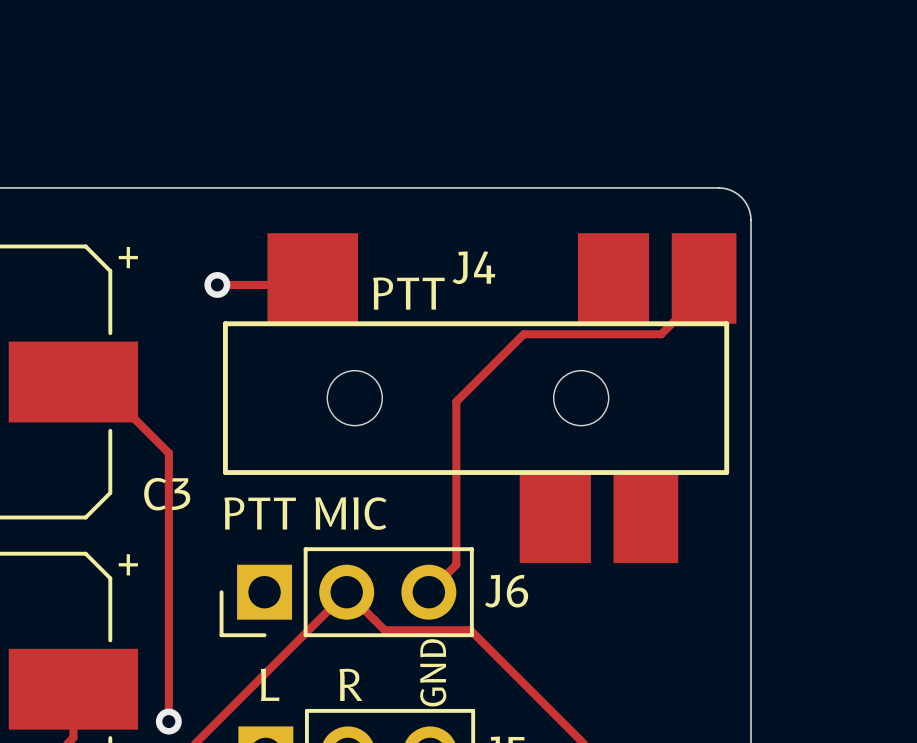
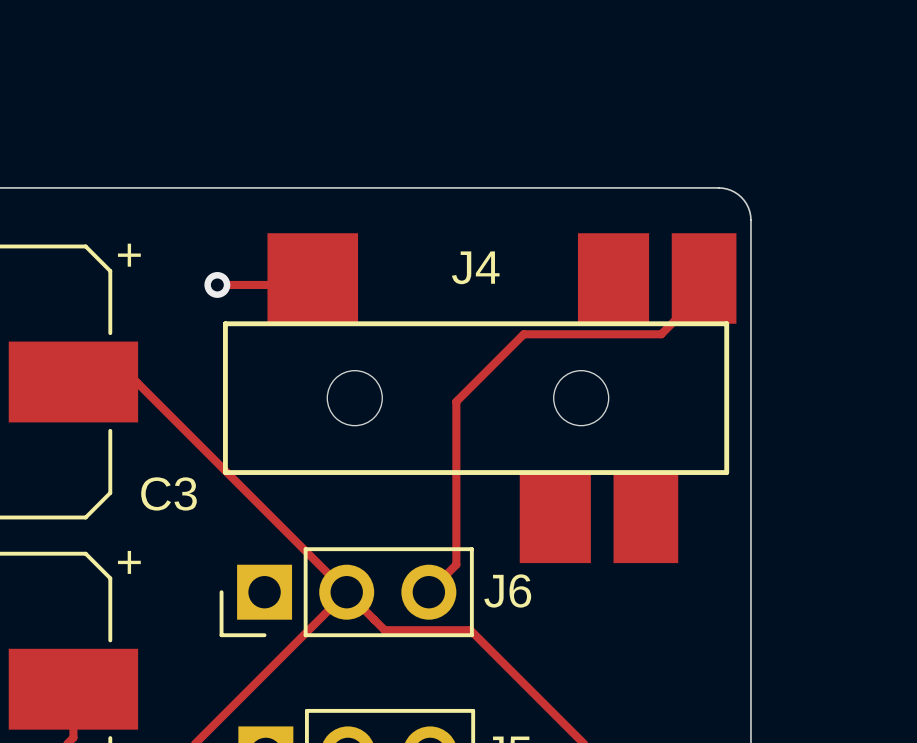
text: PTT (408, 293) -> none
track: (97, 381) (168, 453) (168, 721) -> (97, 381) (136, 381) (346, 592)
text: PTT (260, 513) -> none
text: MIC (350, 513) -> none
text: GND (433, 672) -> none
text: L (270, 684) -> none
text: R (350, 684) -> none
via: (168, 721) -> none

